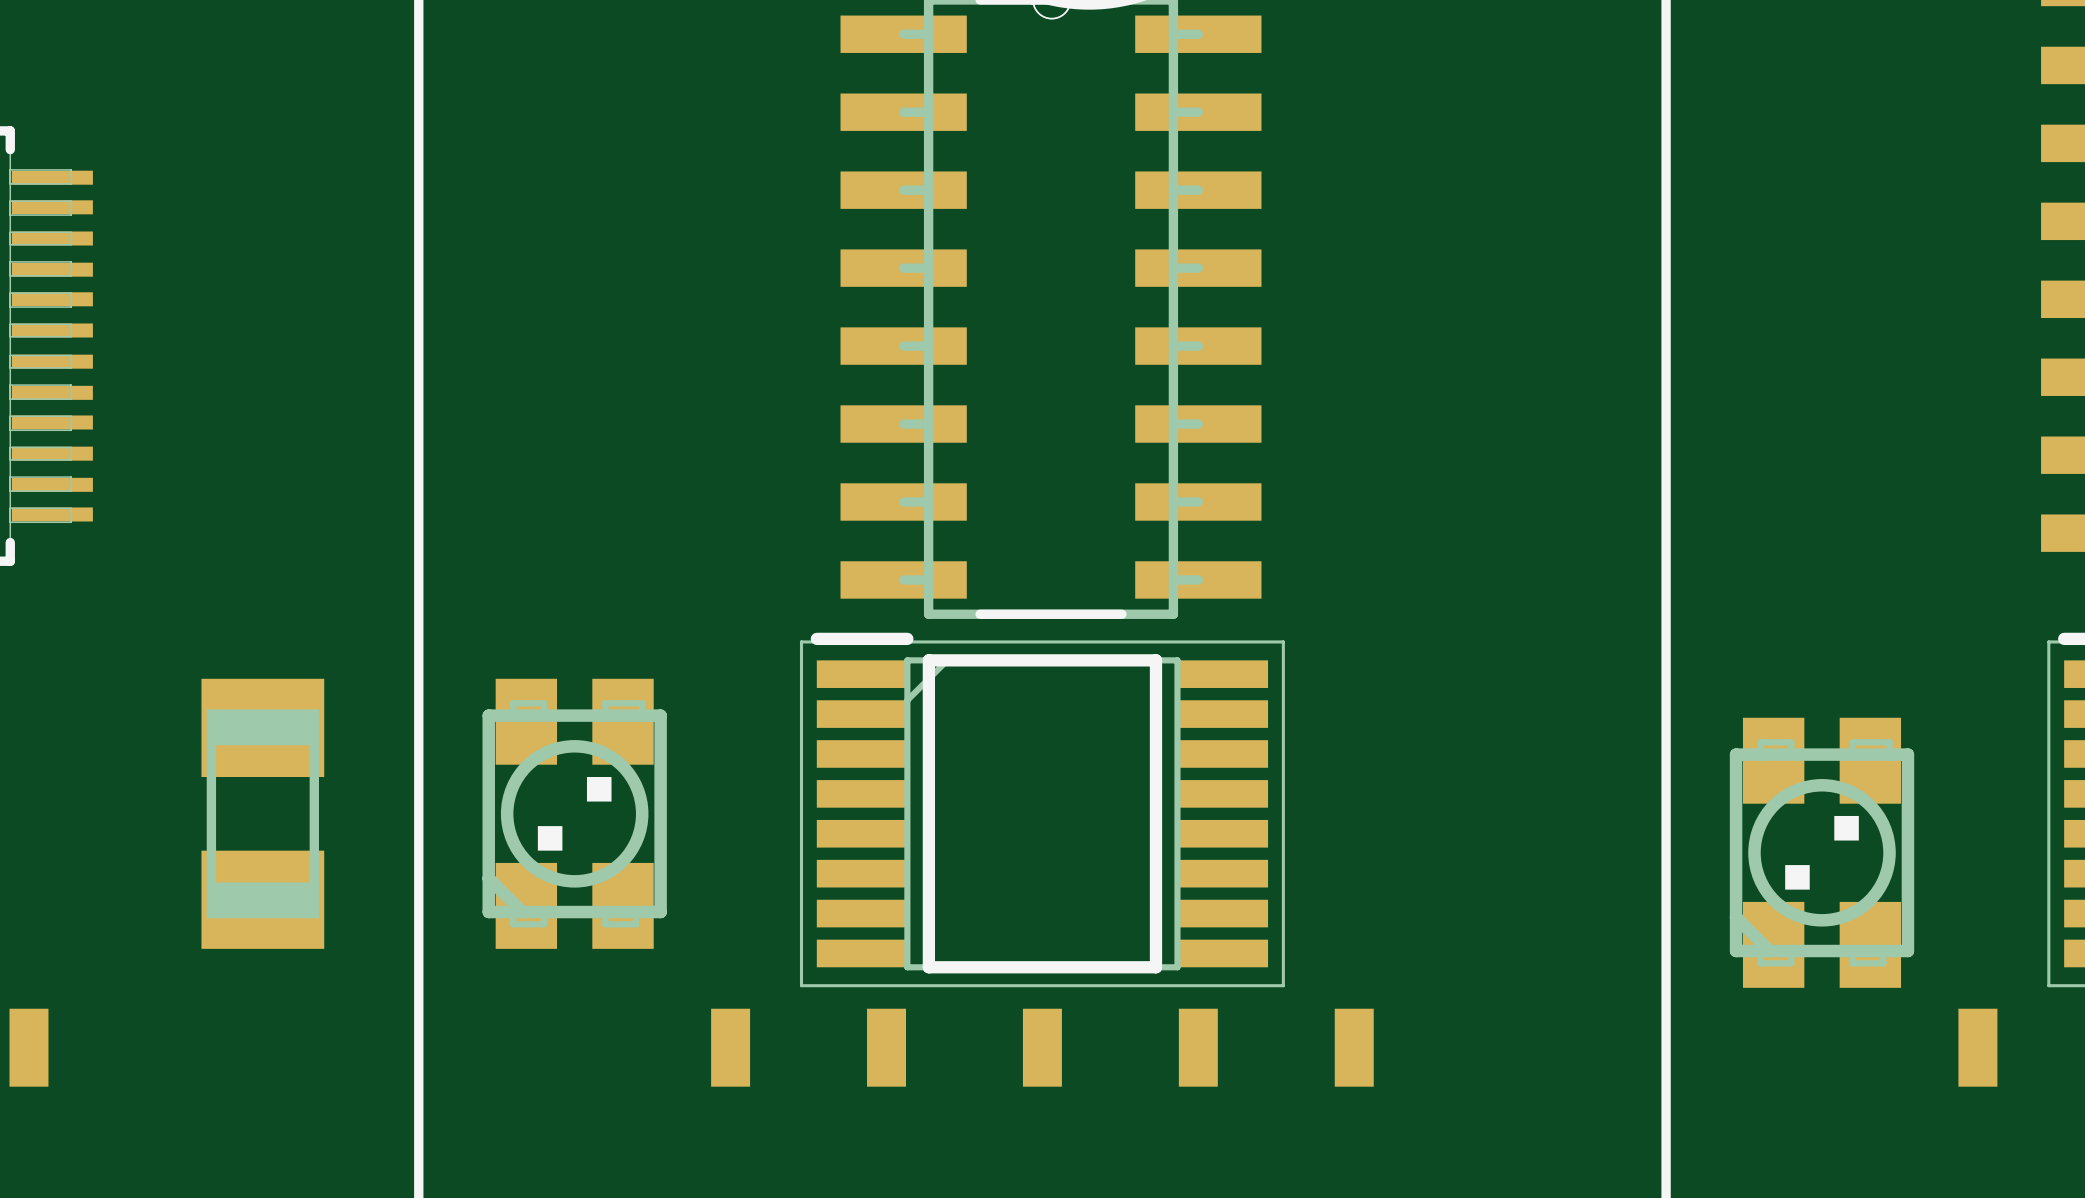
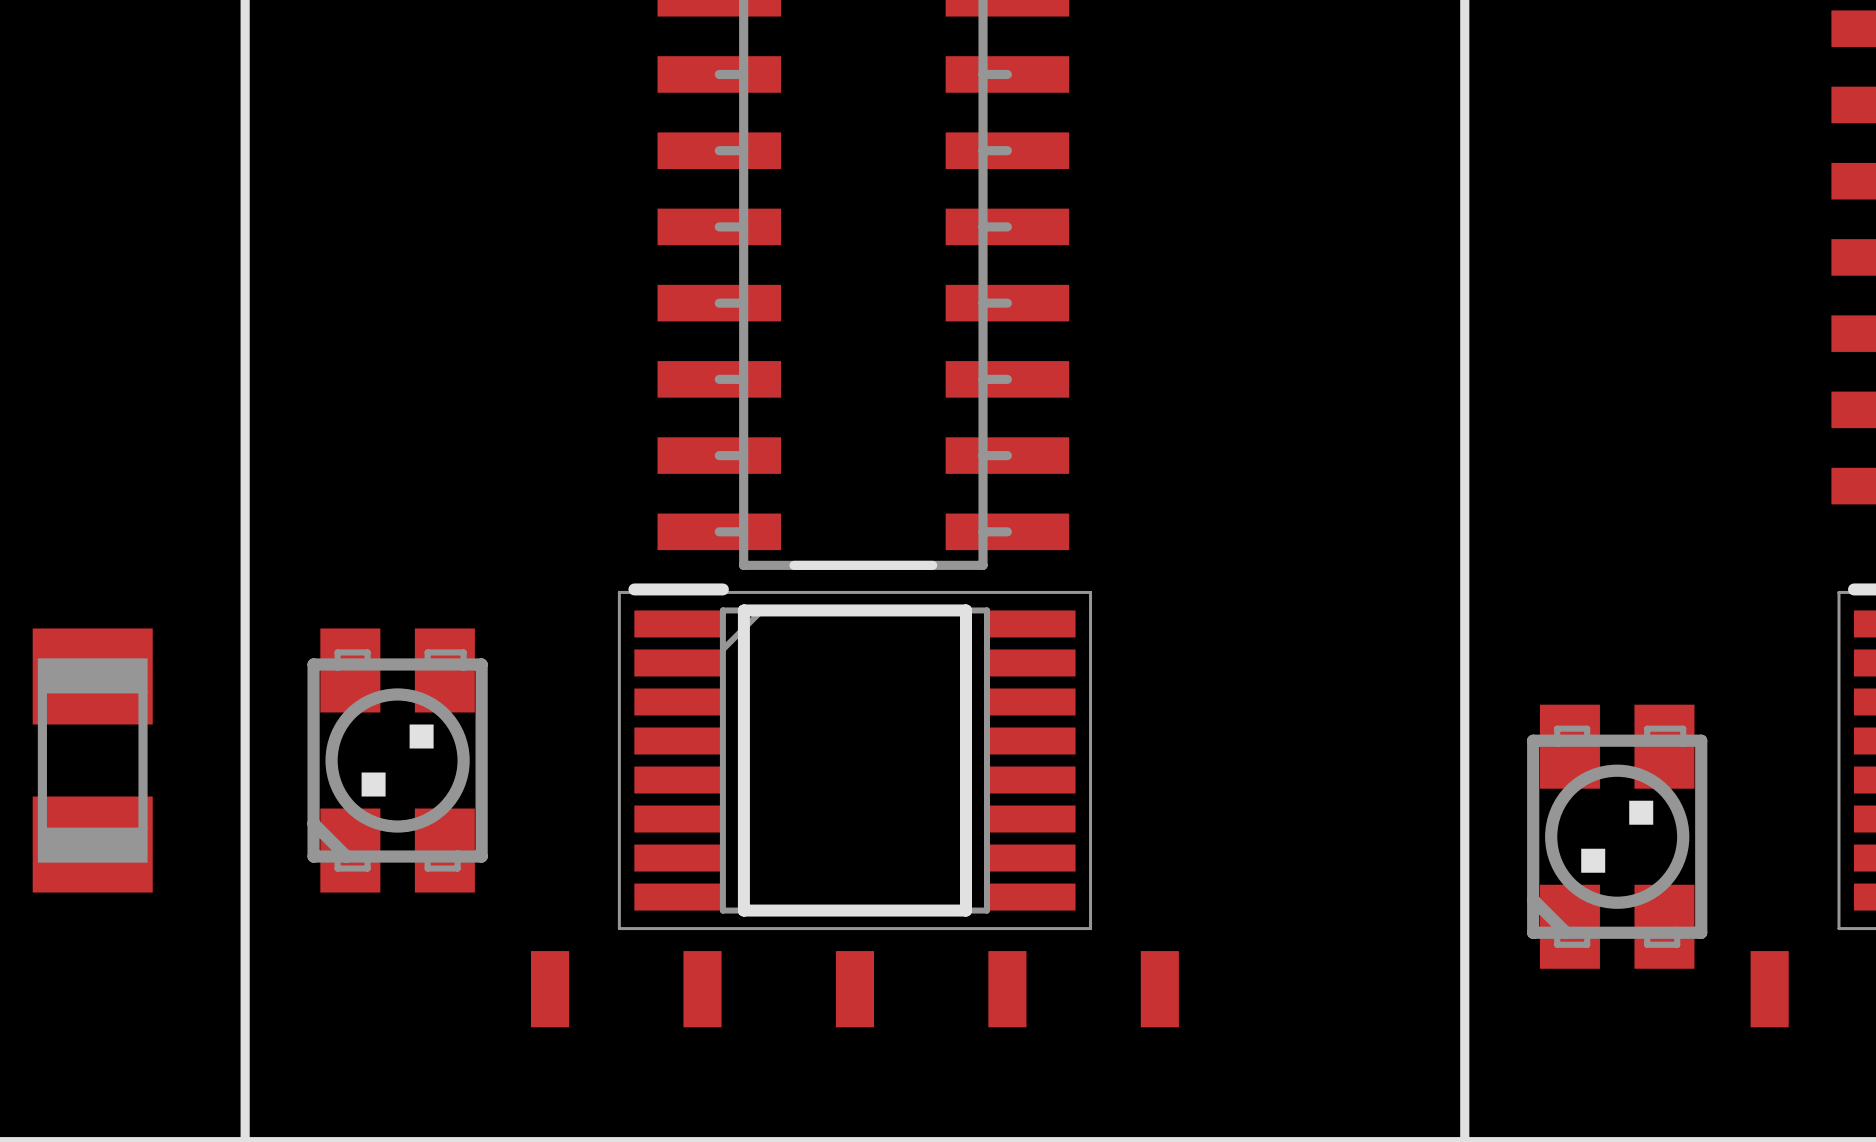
part position: (1822, 852) -> (1617, 836)

